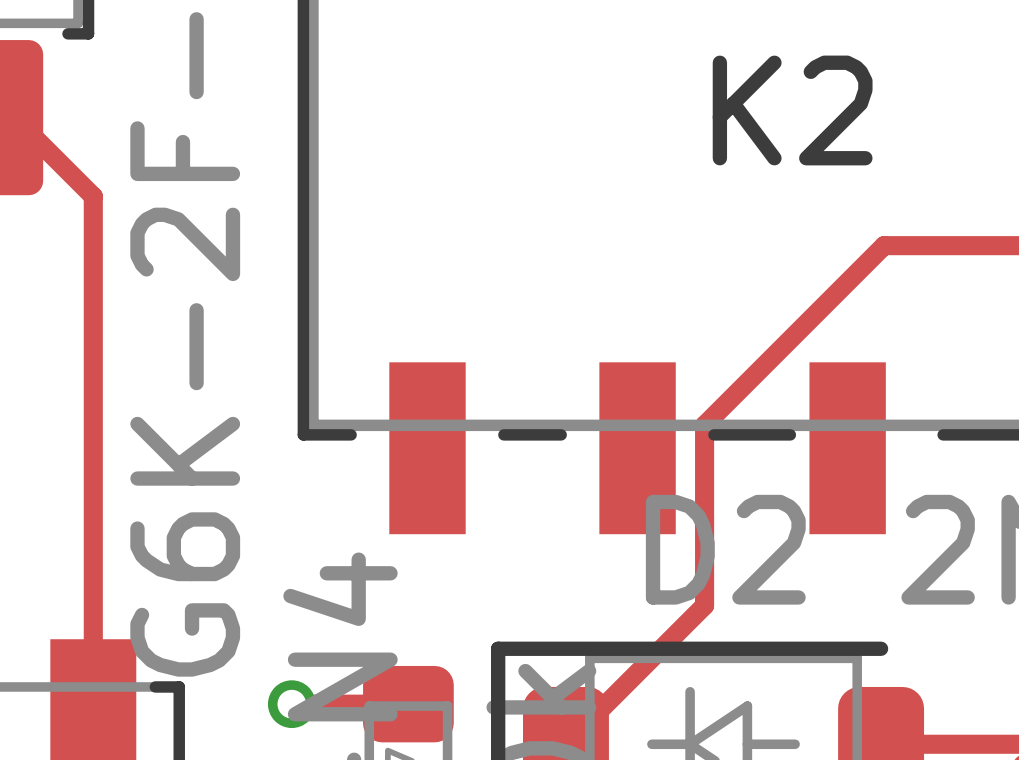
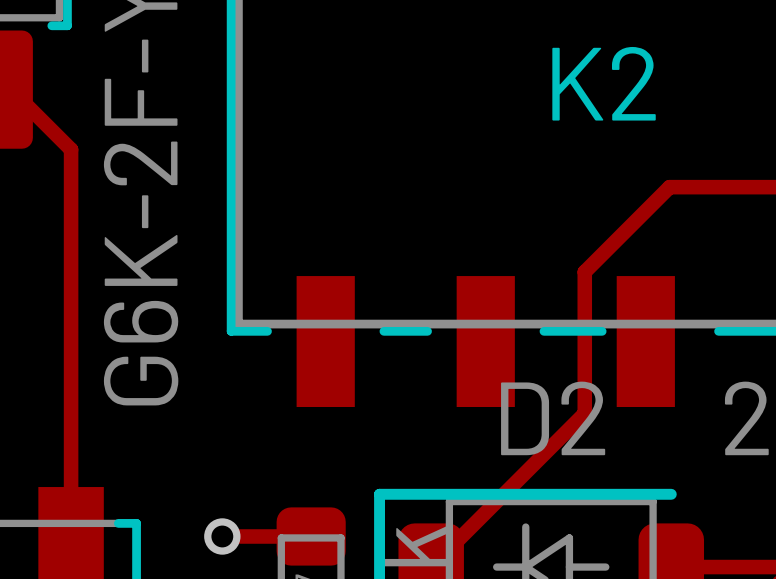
top track: (884, 245) (704, 425) (704, 605) -> (673, 187) (669, 187) (584, 272) (584, 413) (536, 461)

